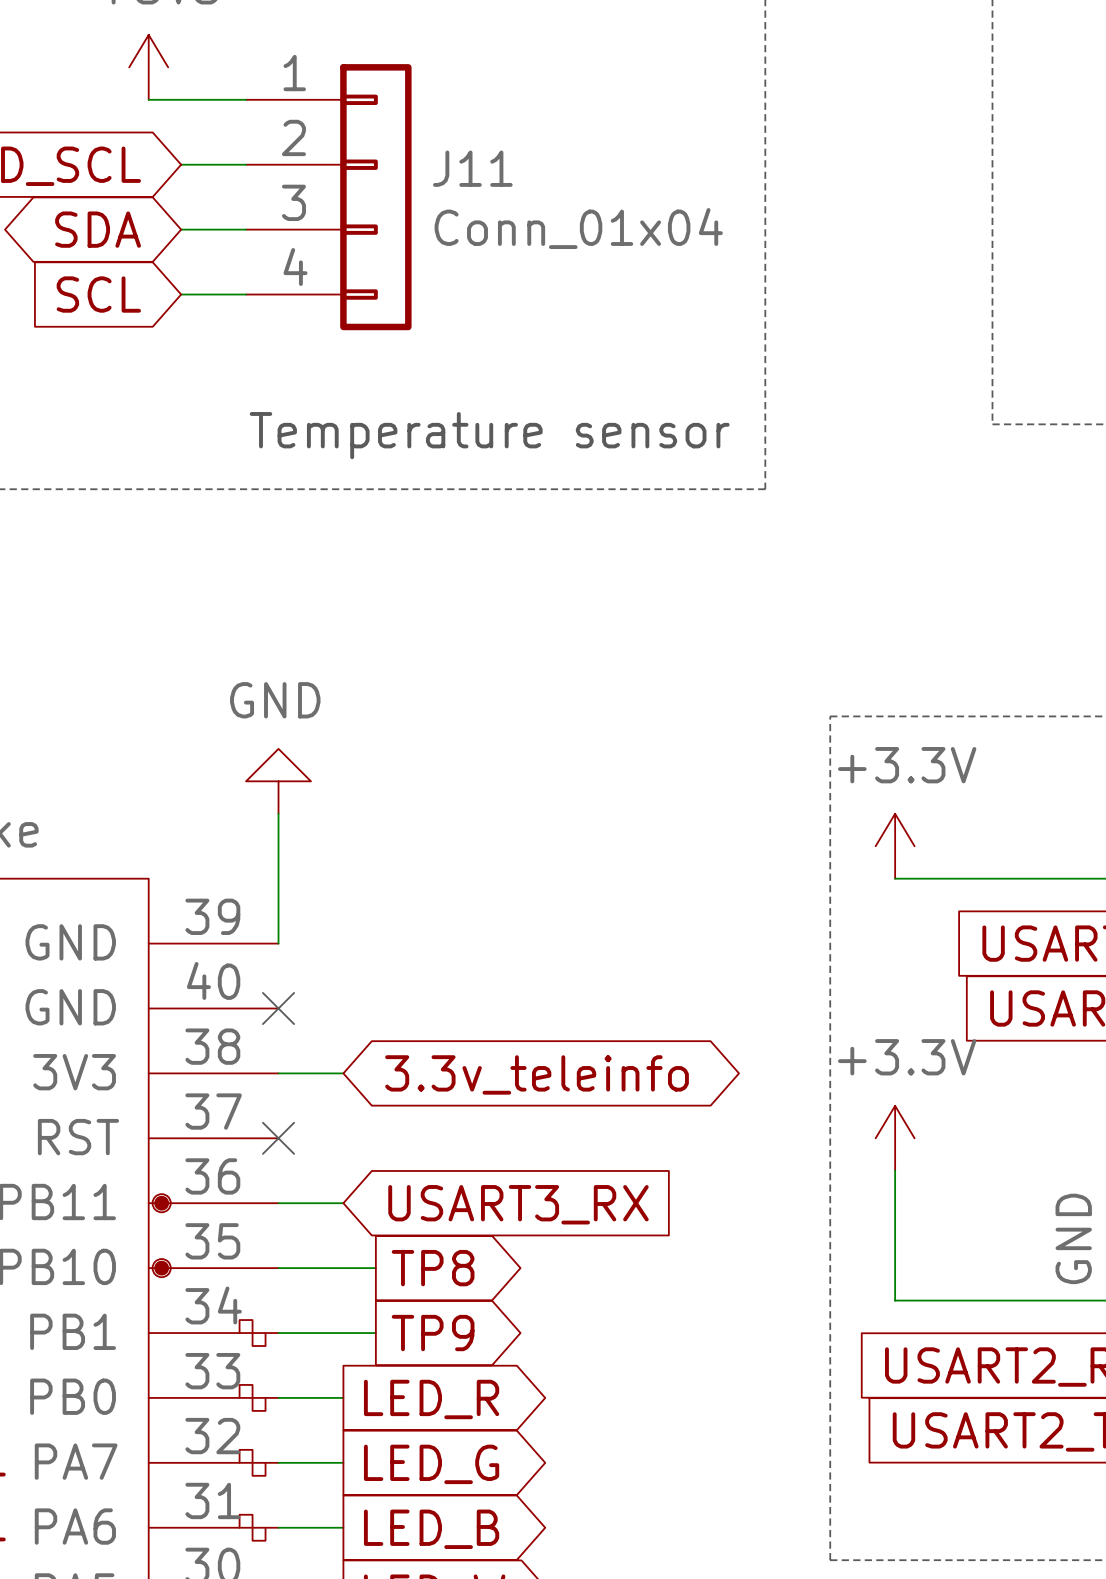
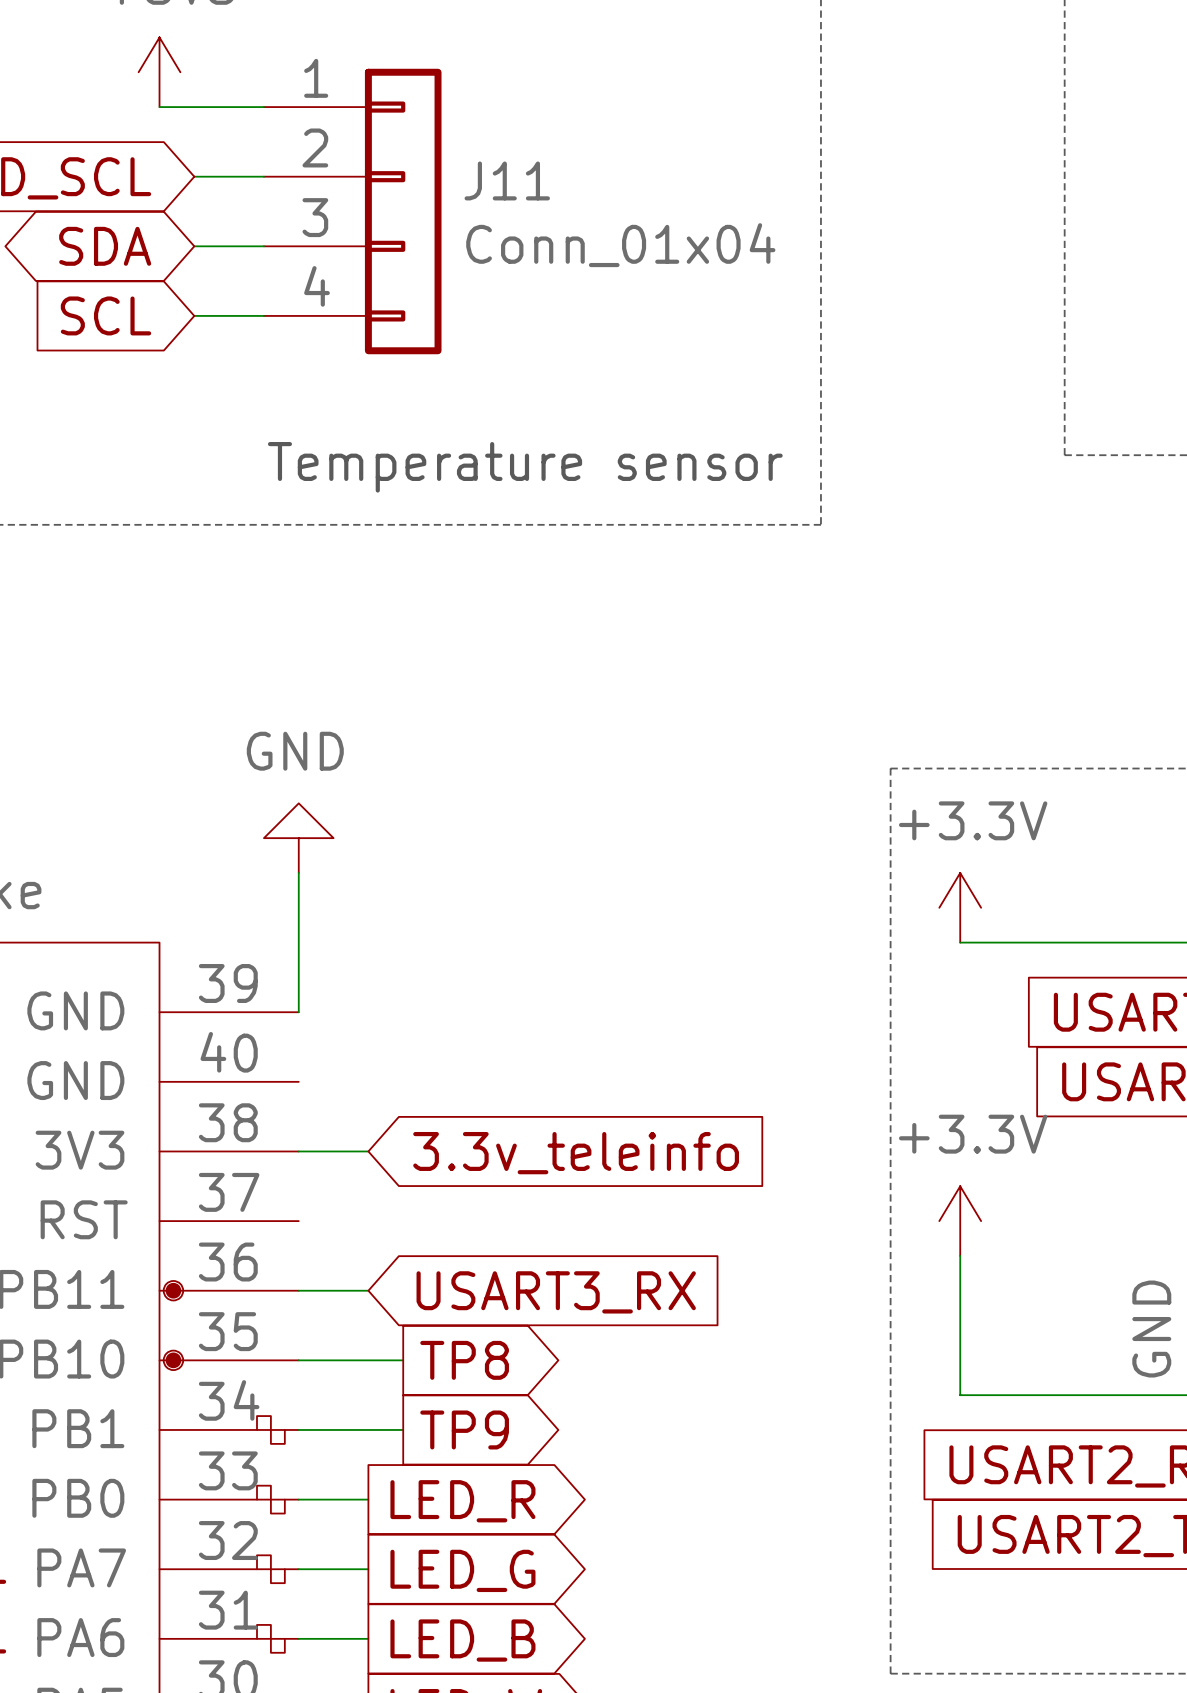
no-connect mark: (278, 1008) -> none
global label shape: bidirectional (537, 1074) -> input (576, 1153)
no-connect mark: (278, 1138) -> none

